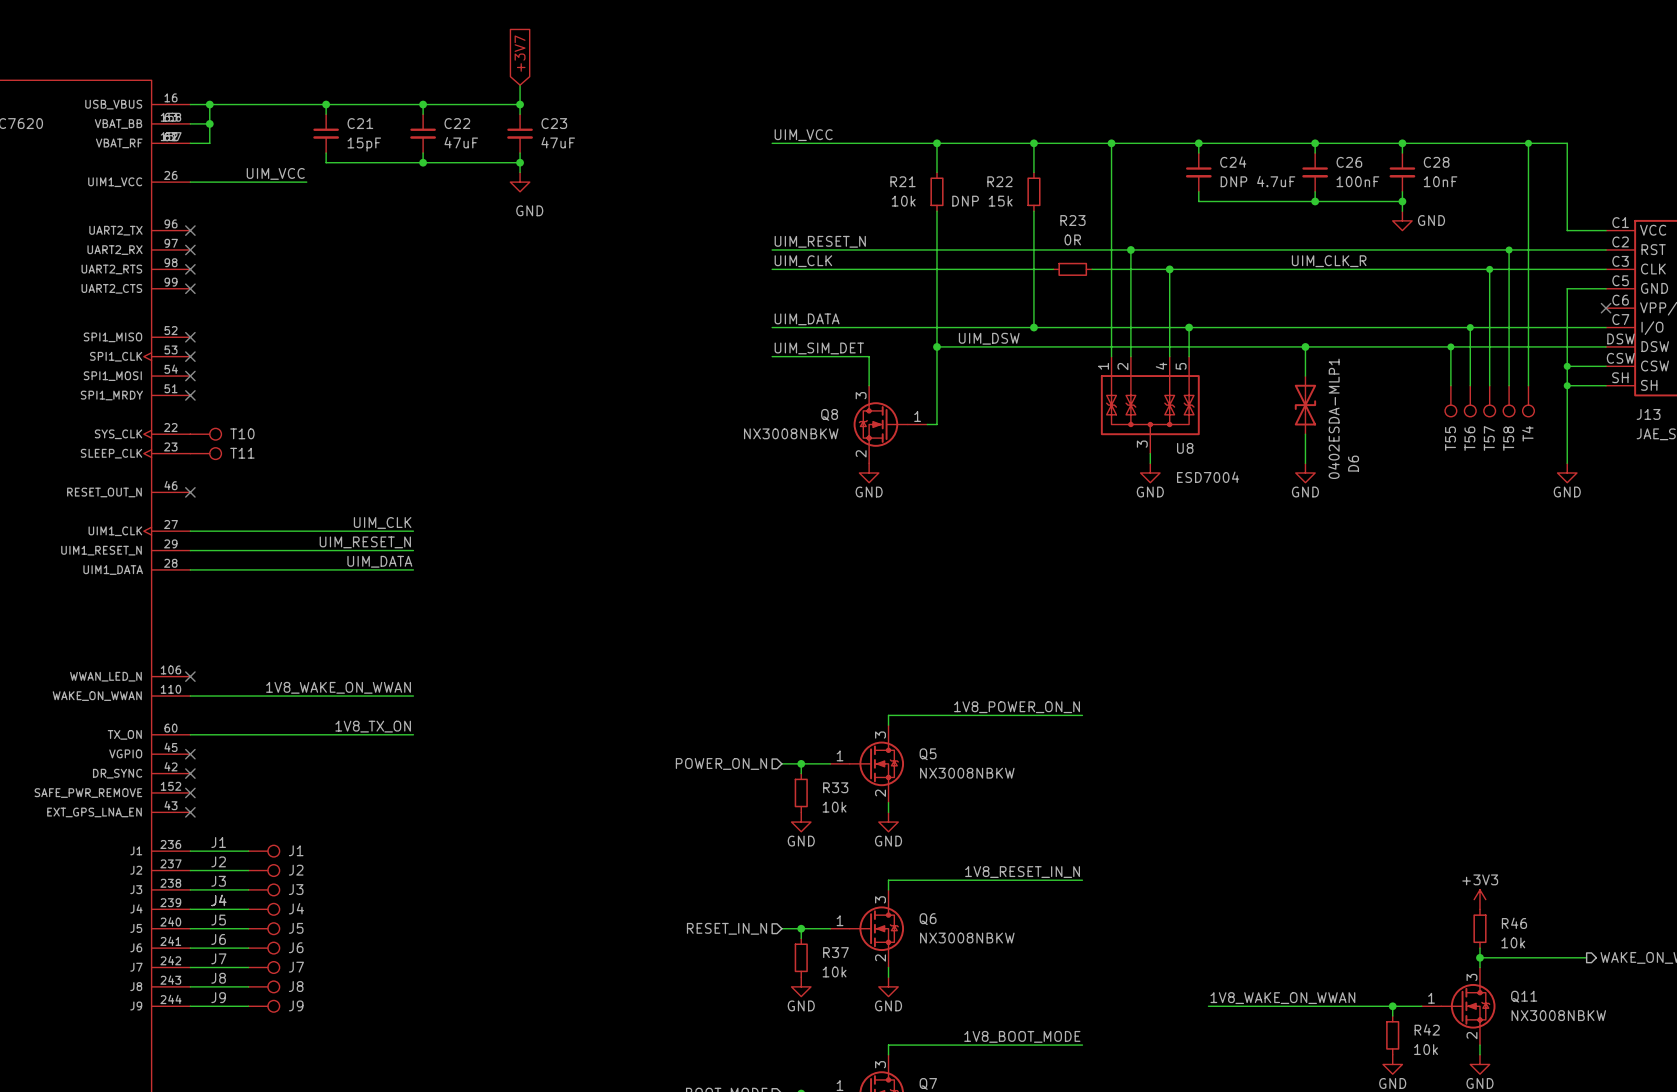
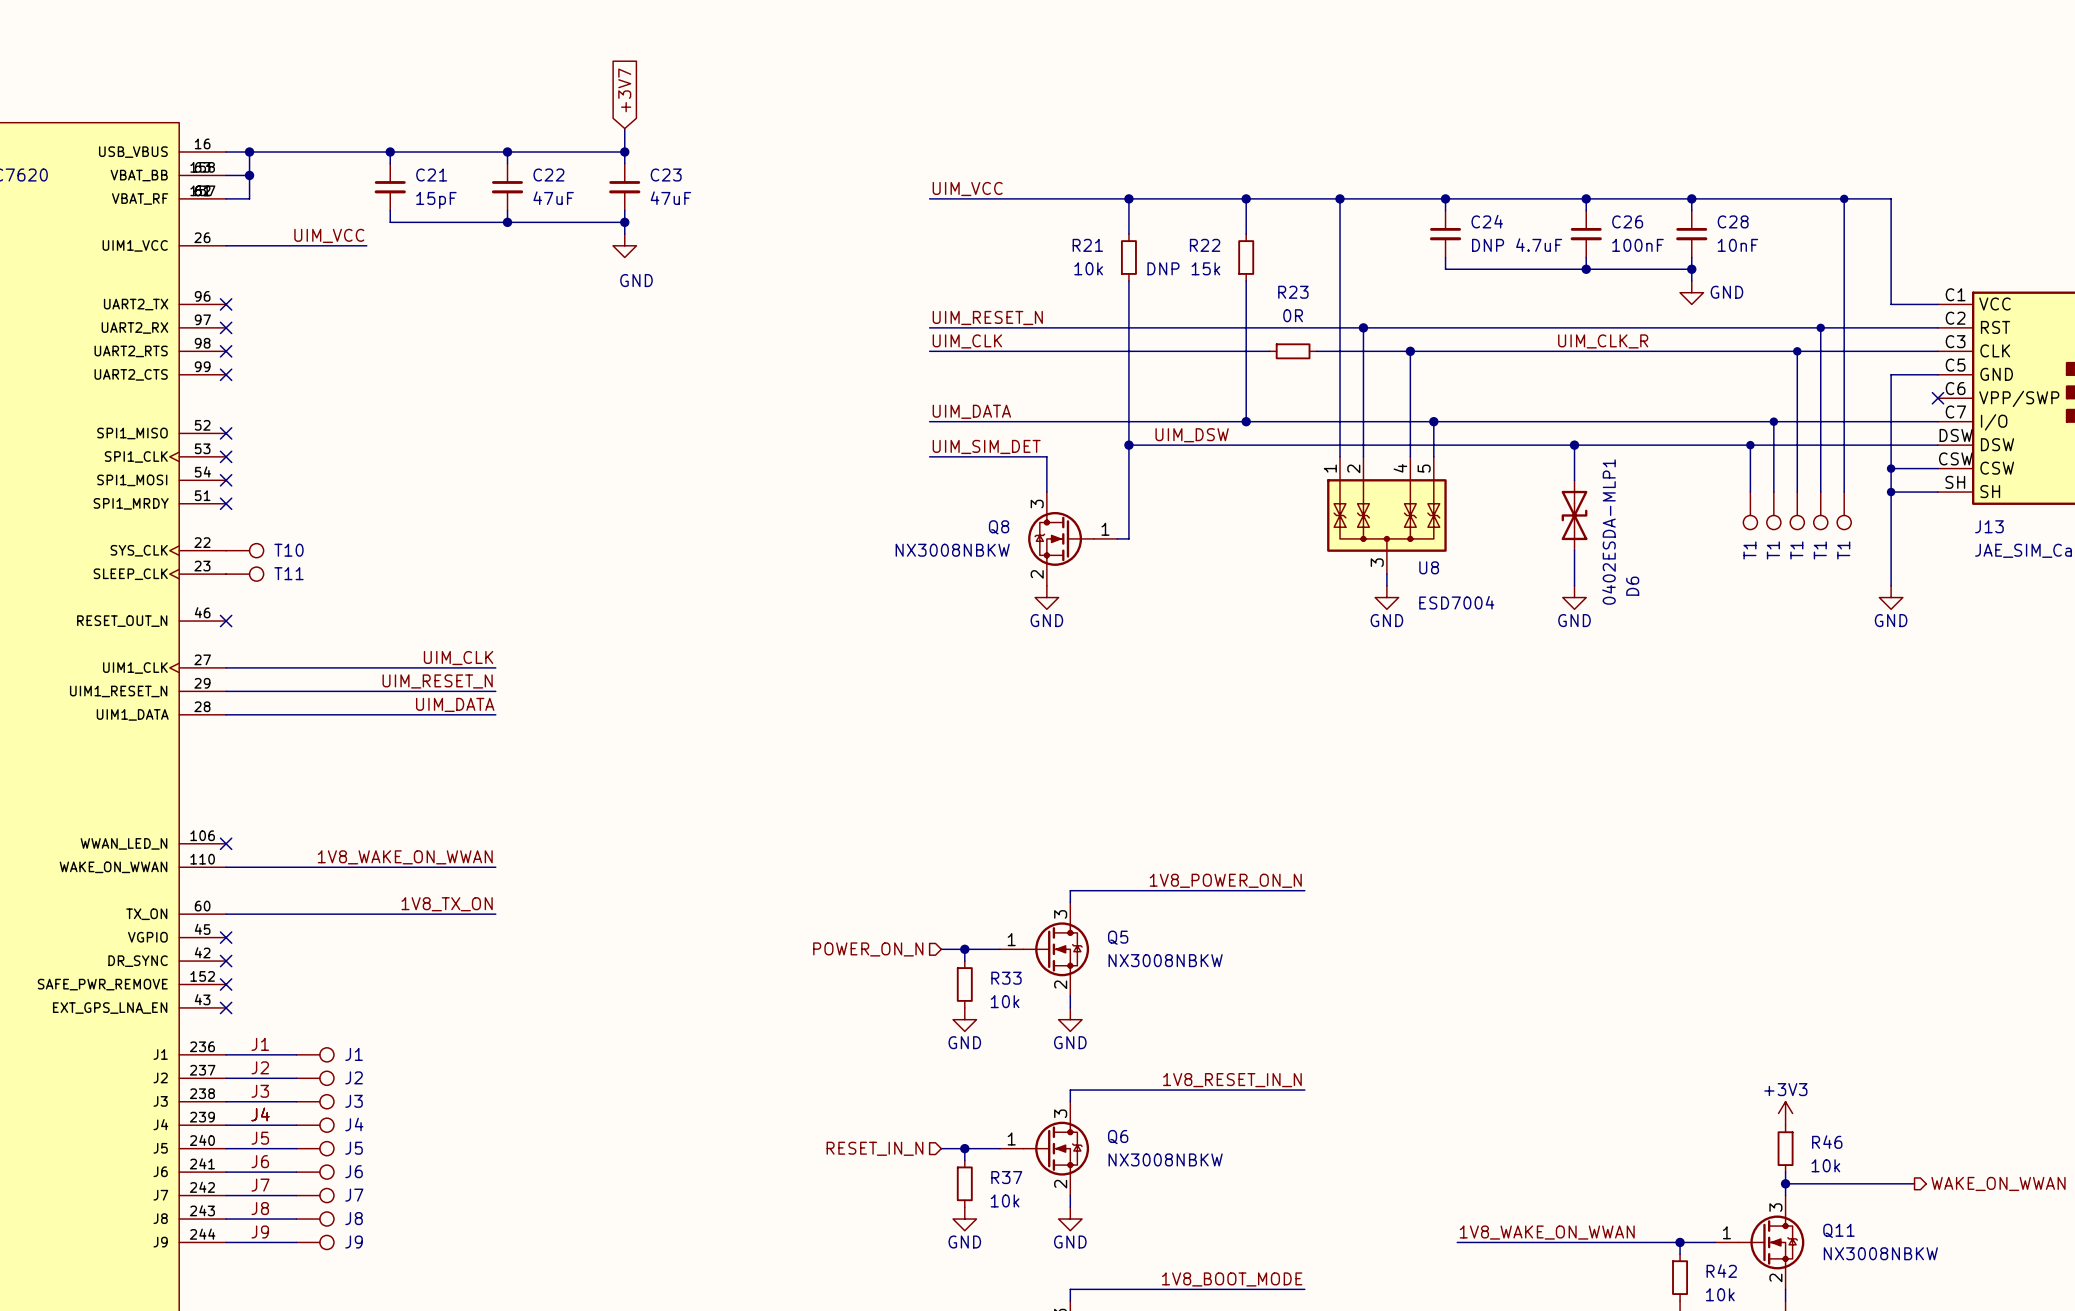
T4 name: T4 (1527, 433) -> T1 (1843, 550)
T55 name: T55 (1450, 438) -> T1 (1749, 550)
T56 name: T56 (1469, 438) -> T1 (1773, 550)
T57 name: T57 (1489, 438) -> T1 (1796, 550)
T58 name: T58 (1508, 438) -> T1 (1820, 550)

